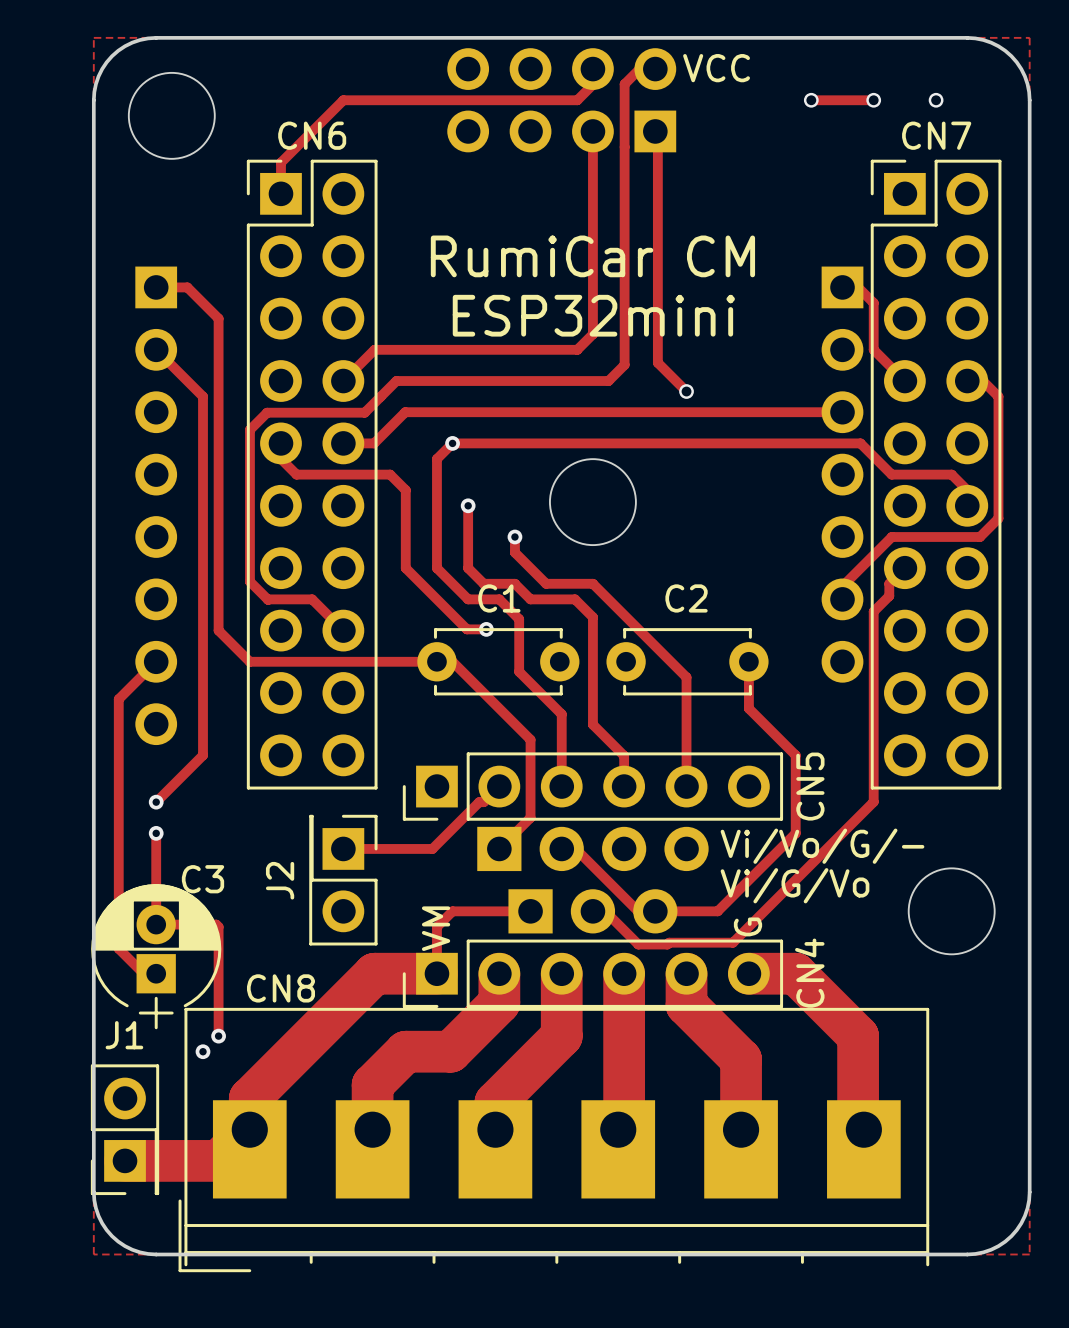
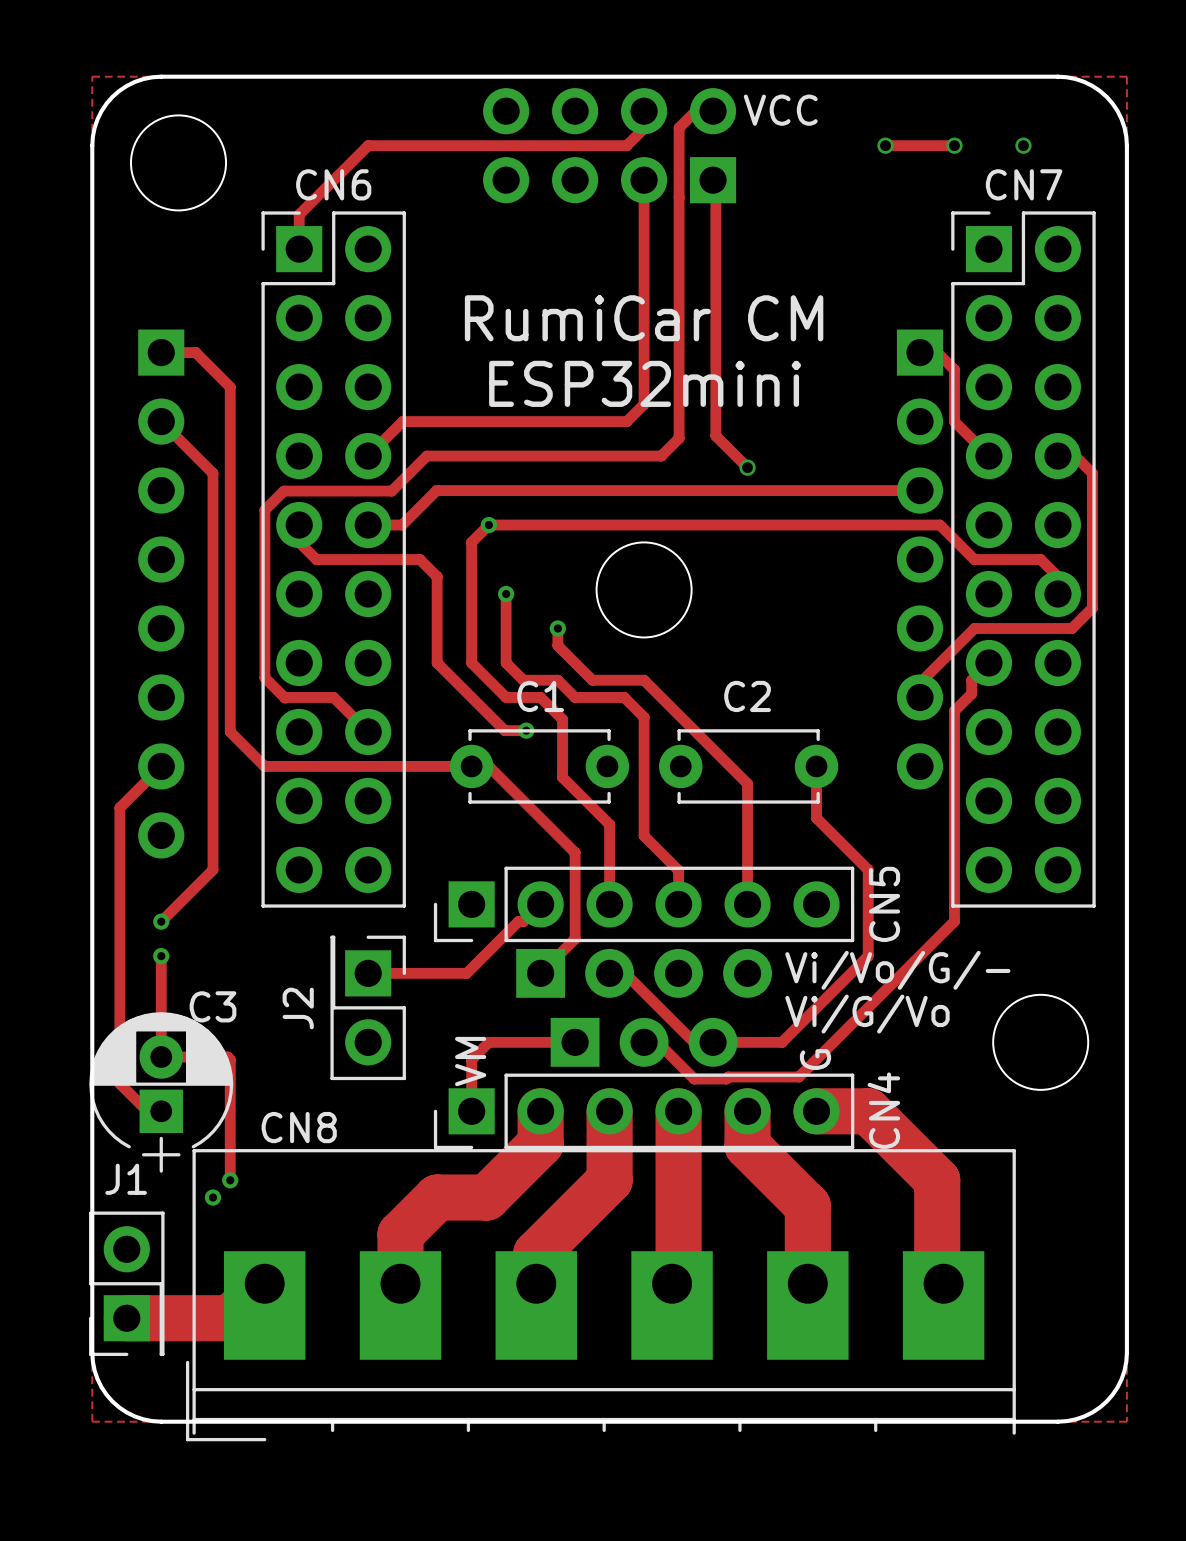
track: (436, 973) (374, 973) (249, 1098) (249, 1129) -> none

